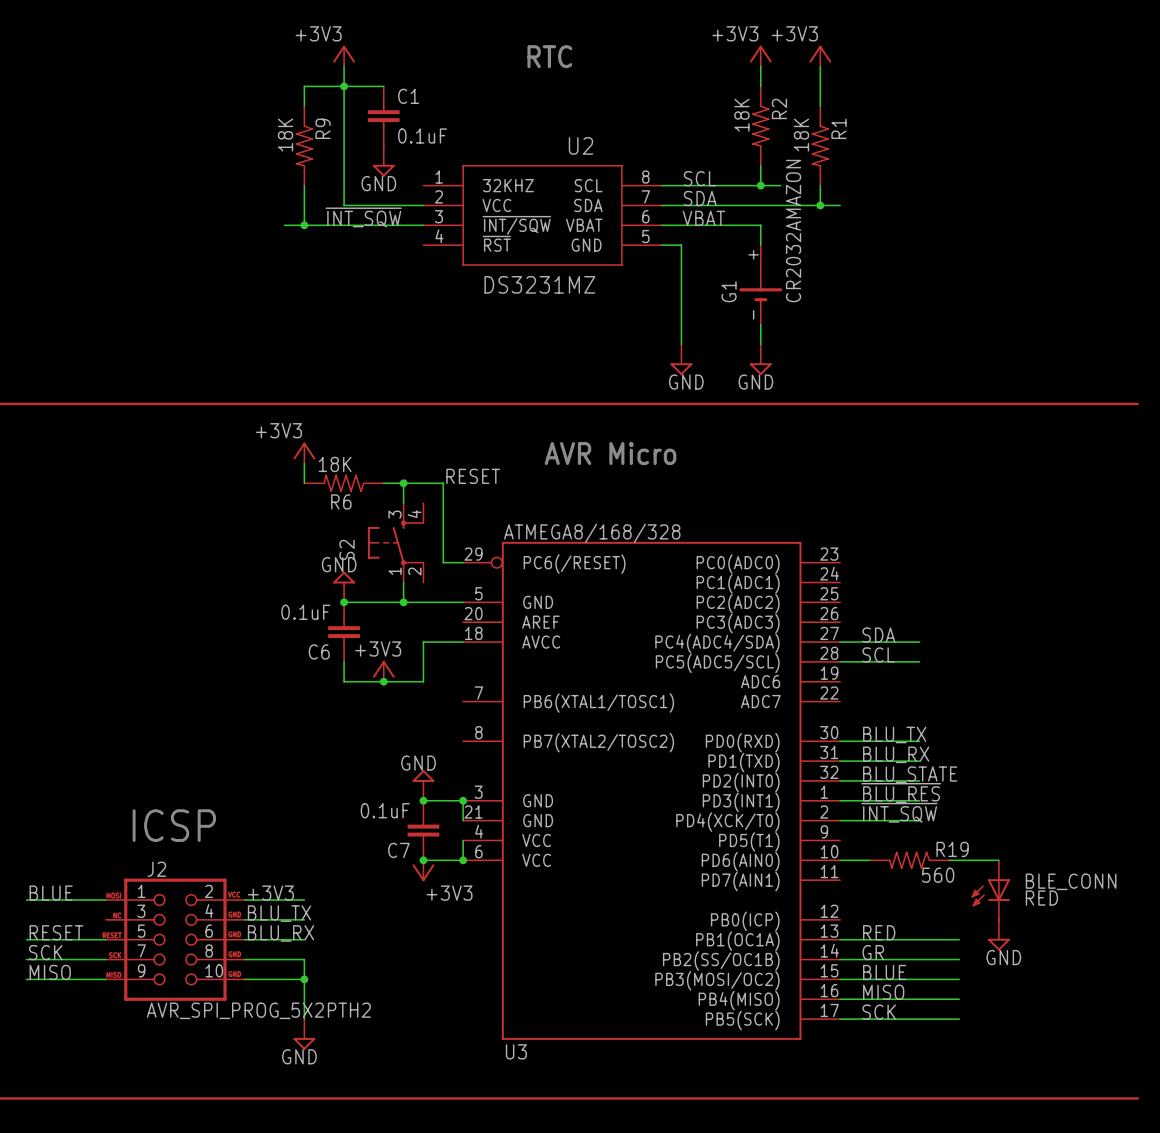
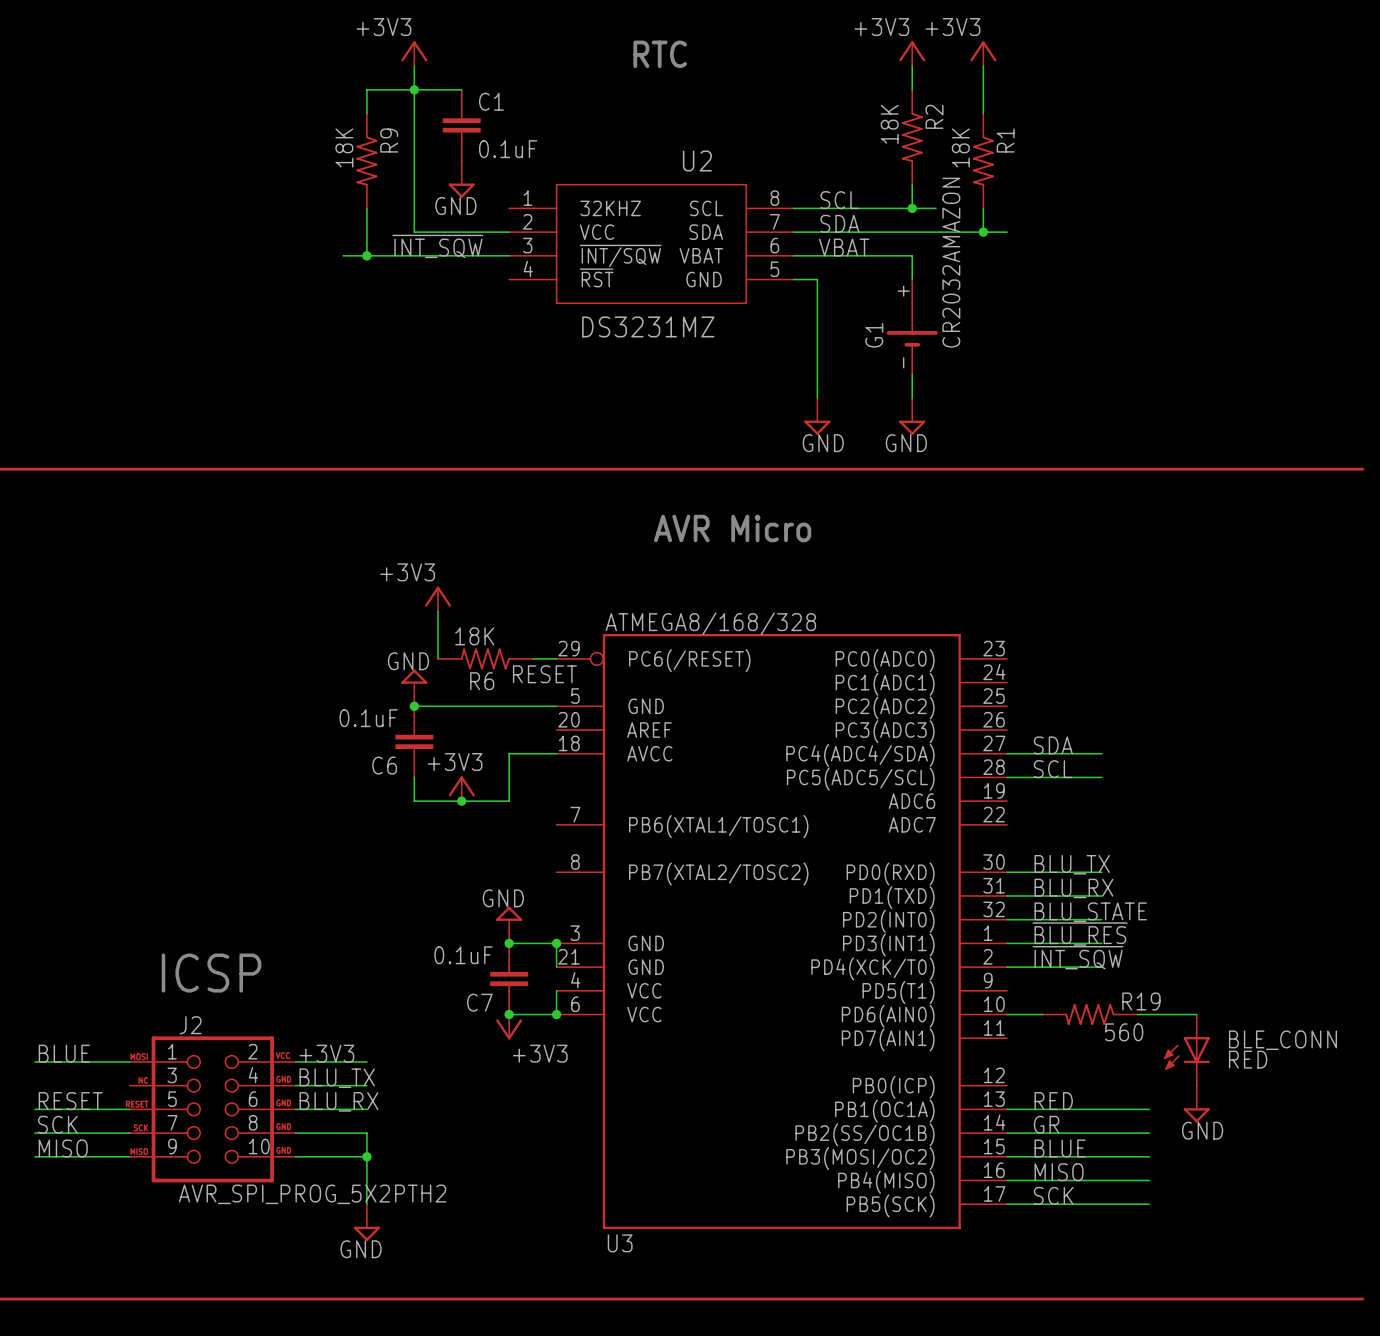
power symbol position: +3V3 (304, 453) -> +3V3 (438, 599)
wire: (304, 463) (304, 483) -> none
label position: RESET (473, 476) -> RESET (544, 674)
R6 position: (344, 483) -> (485, 658)
wire: (383, 483) (443, 483) (443, 562) -> none
wire: (403, 483) (403, 503) -> none
junction: (403, 483) -> none
wire: none -> (438, 611) (438, 658)
S2: (395, 542) -> none
wire: (403, 582) (403, 602) -> none
junction: (403, 602) -> none

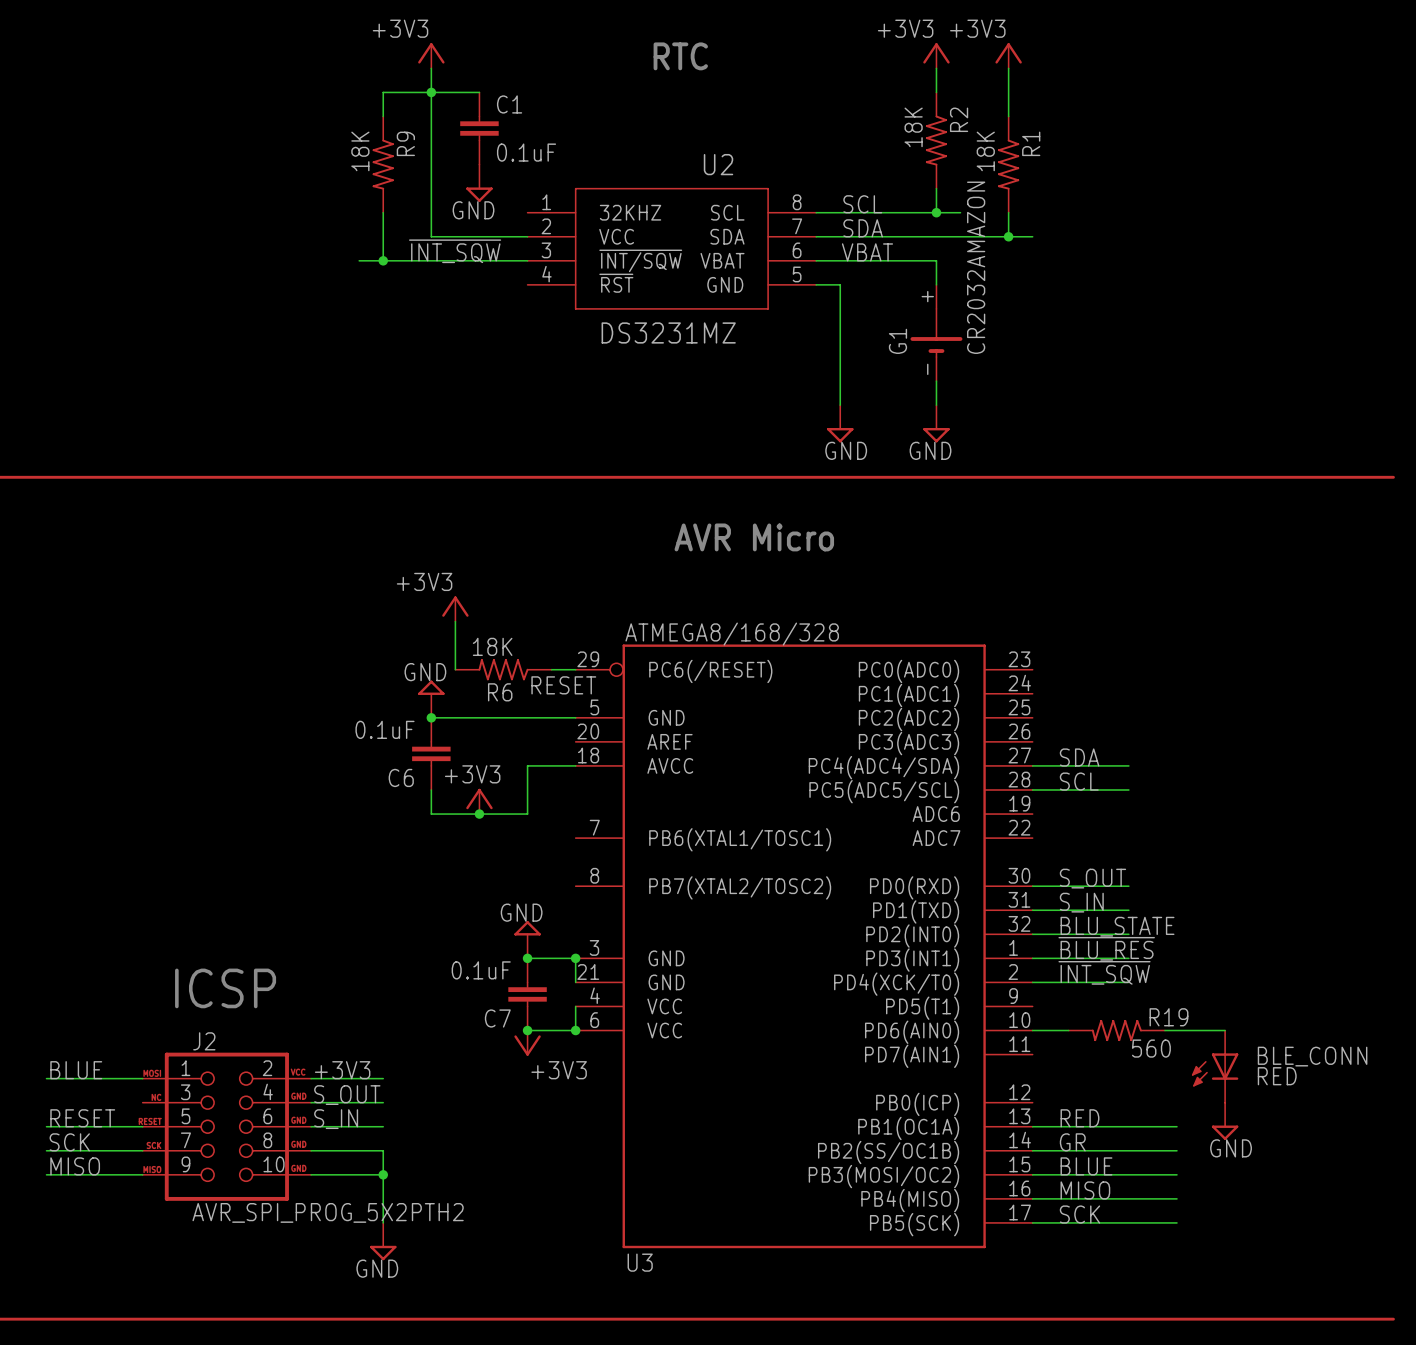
label: BLU_TX (1072, 864) -> S_OUT (1092, 878)
label: BLU_RX (1073, 888) -> S_IN (1081, 902)
label: BLU_TX (337, 1078) -> S_OUT (347, 1095)
label: BLU_RX (338, 1101) -> S_IN (336, 1119)

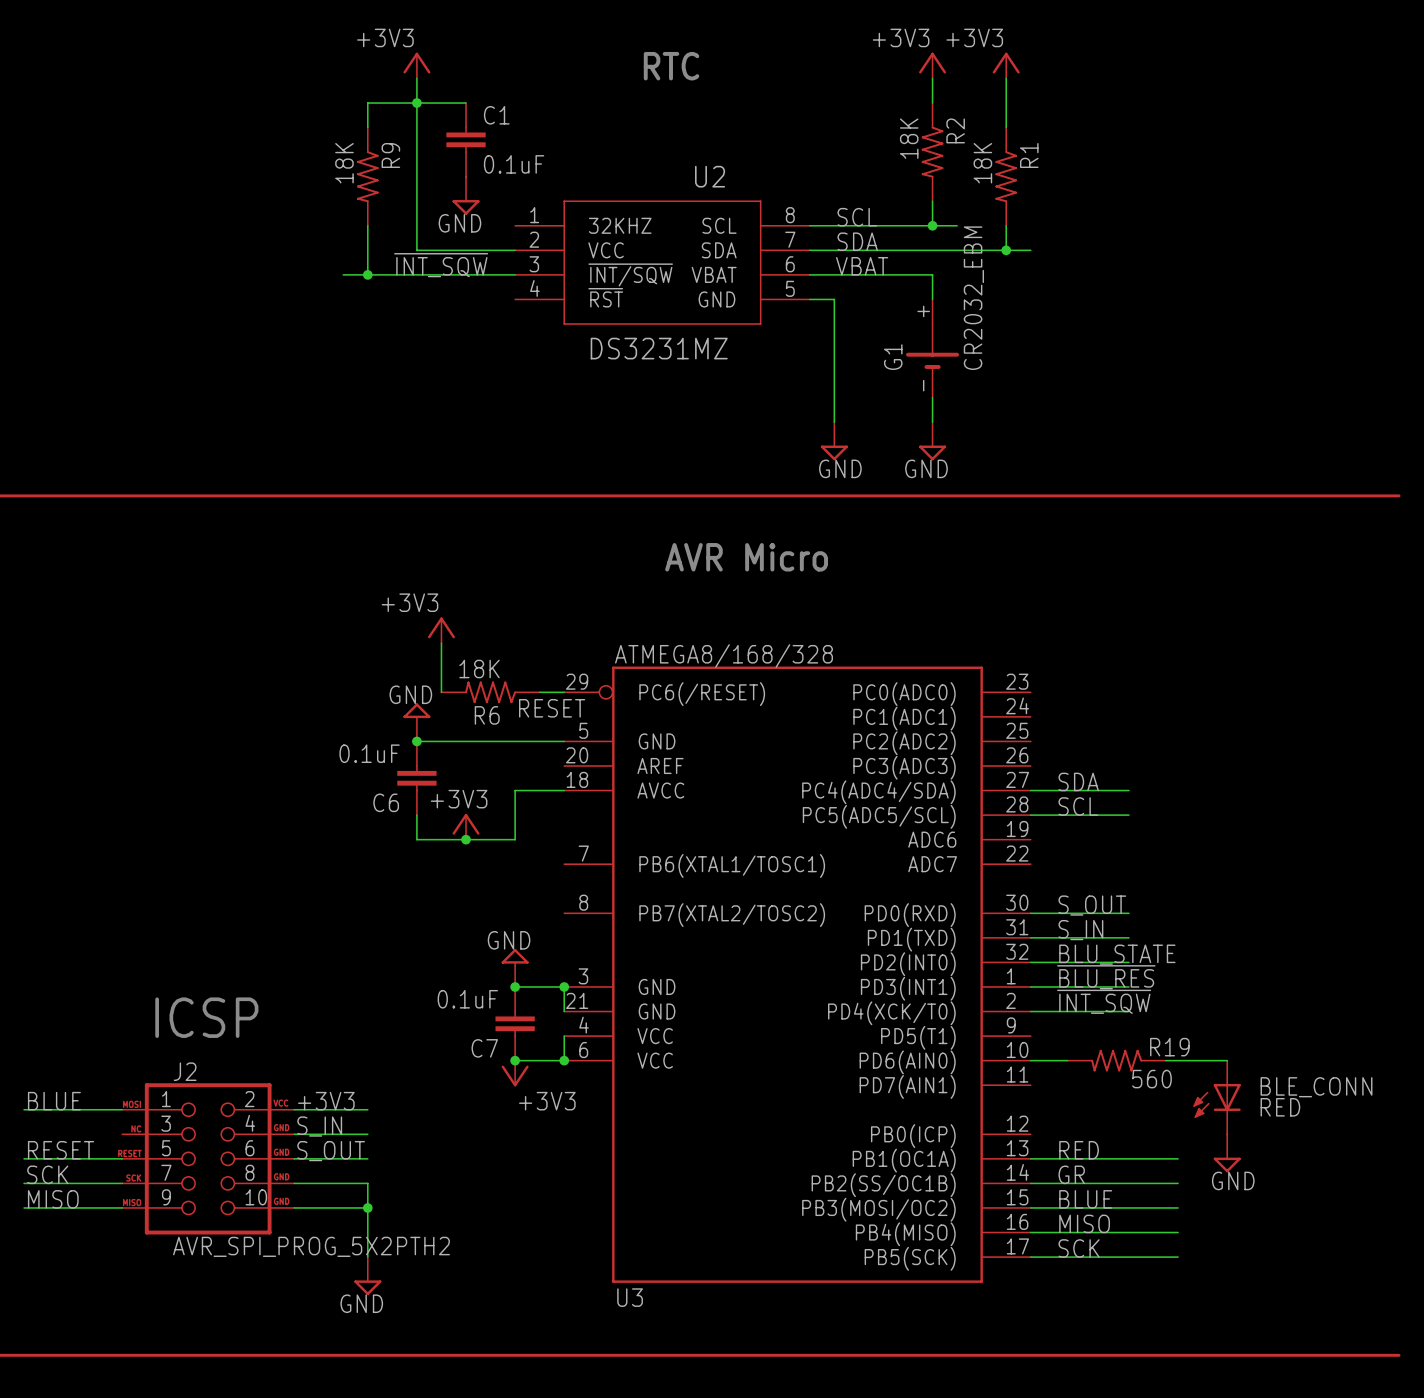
G1 value: CR2032AMAZON (976, 267) -> CR2032_EBM (973, 298)
label: S_OUT (347, 1095) -> S_IN (319, 1126)
label: S_IN (336, 1119) -> S_OUT (331, 1151)

